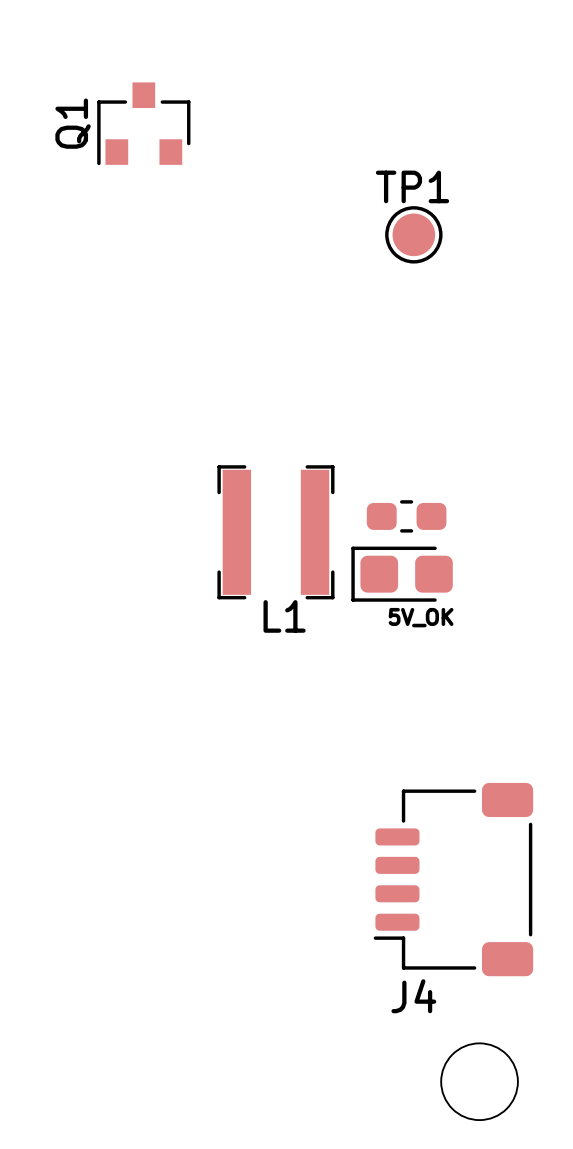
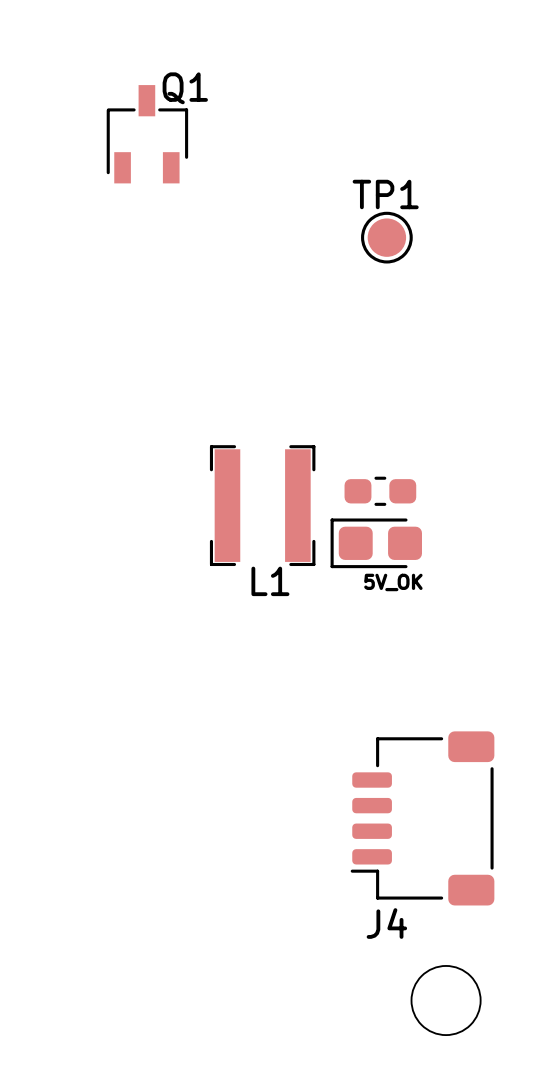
Q1 footprint: [97, 82, 191, 166] -> [106, 85, 189, 184]
Q1 name rotation: 0° (73, 123) -> 90° clockwise (185, 88)
Q1 name position: Q1 (73, 123) -> Q1 (185, 88)

